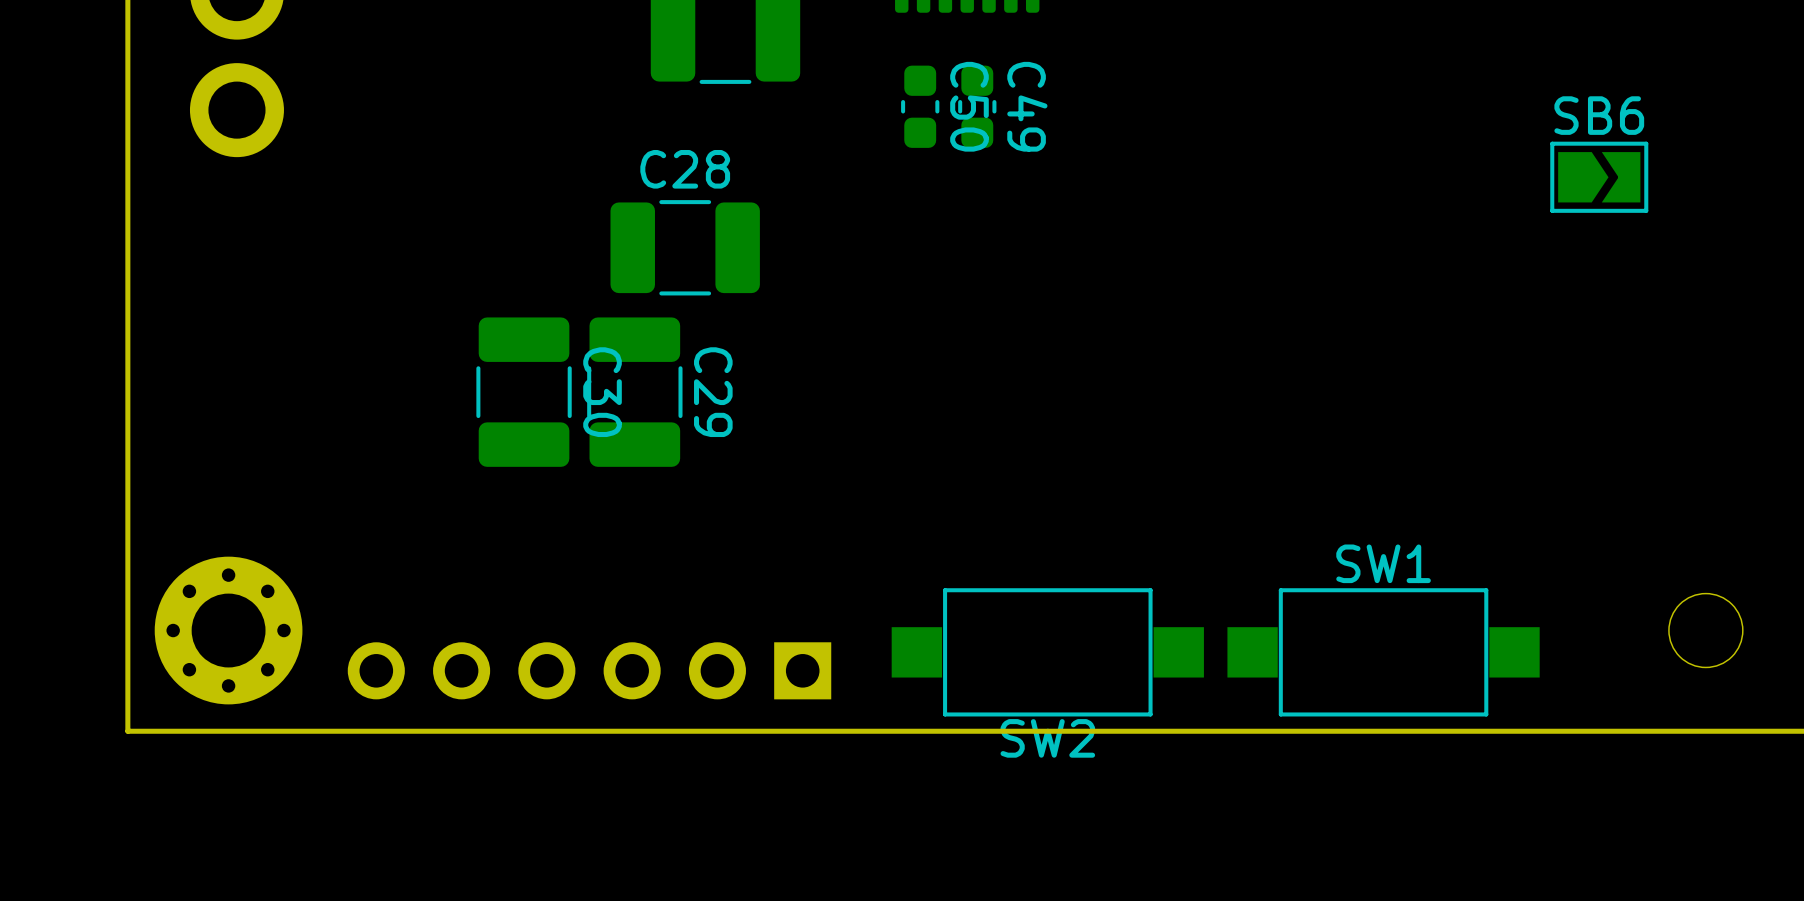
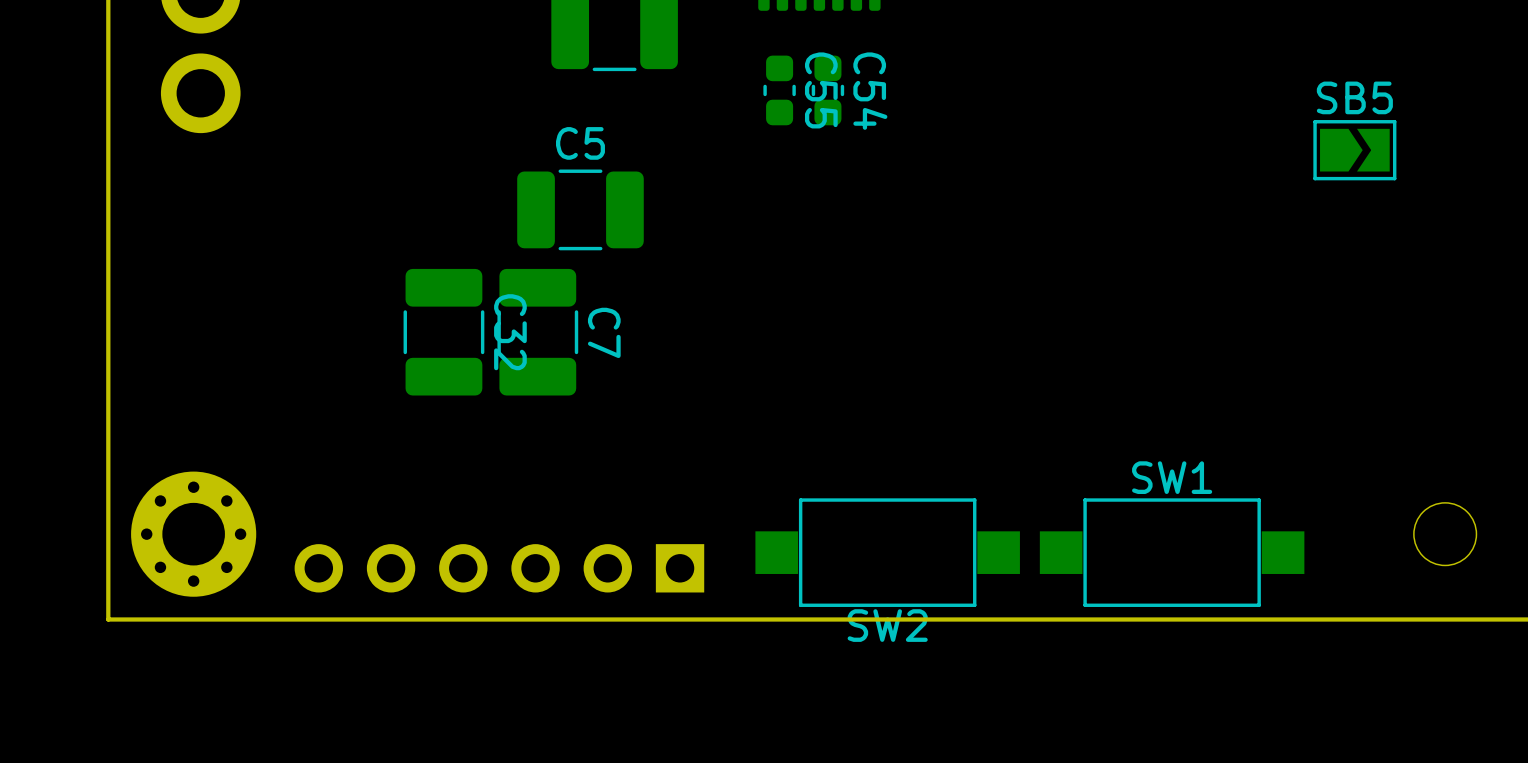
C50 name: C50 (969, 106) -> C55 (821, 90)
C49 name: C49 (1027, 106) -> C54 (870, 91)
SB6 name: SB6 (1599, 115) -> SB5 (1354, 97)
C28 name: C28 (685, 169) -> C5 (580, 143)
C30 name: C30 (602, 392) -> C32 (510, 332)
C29 name: C29 (713, 392) -> C7 (604, 332)

